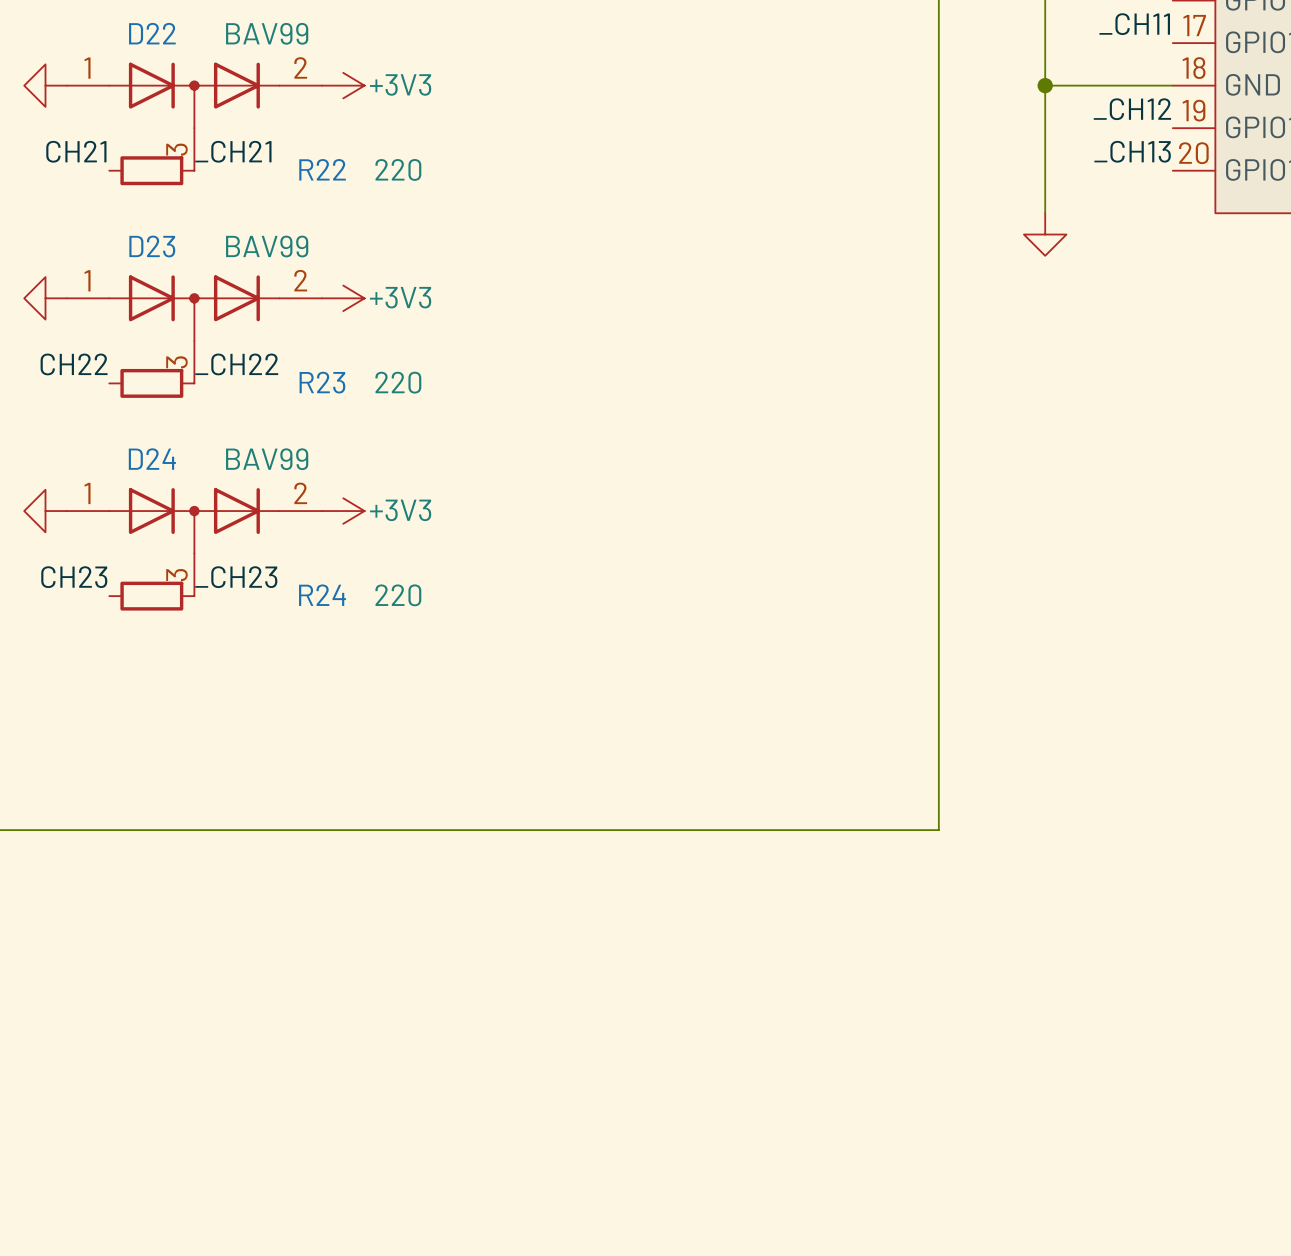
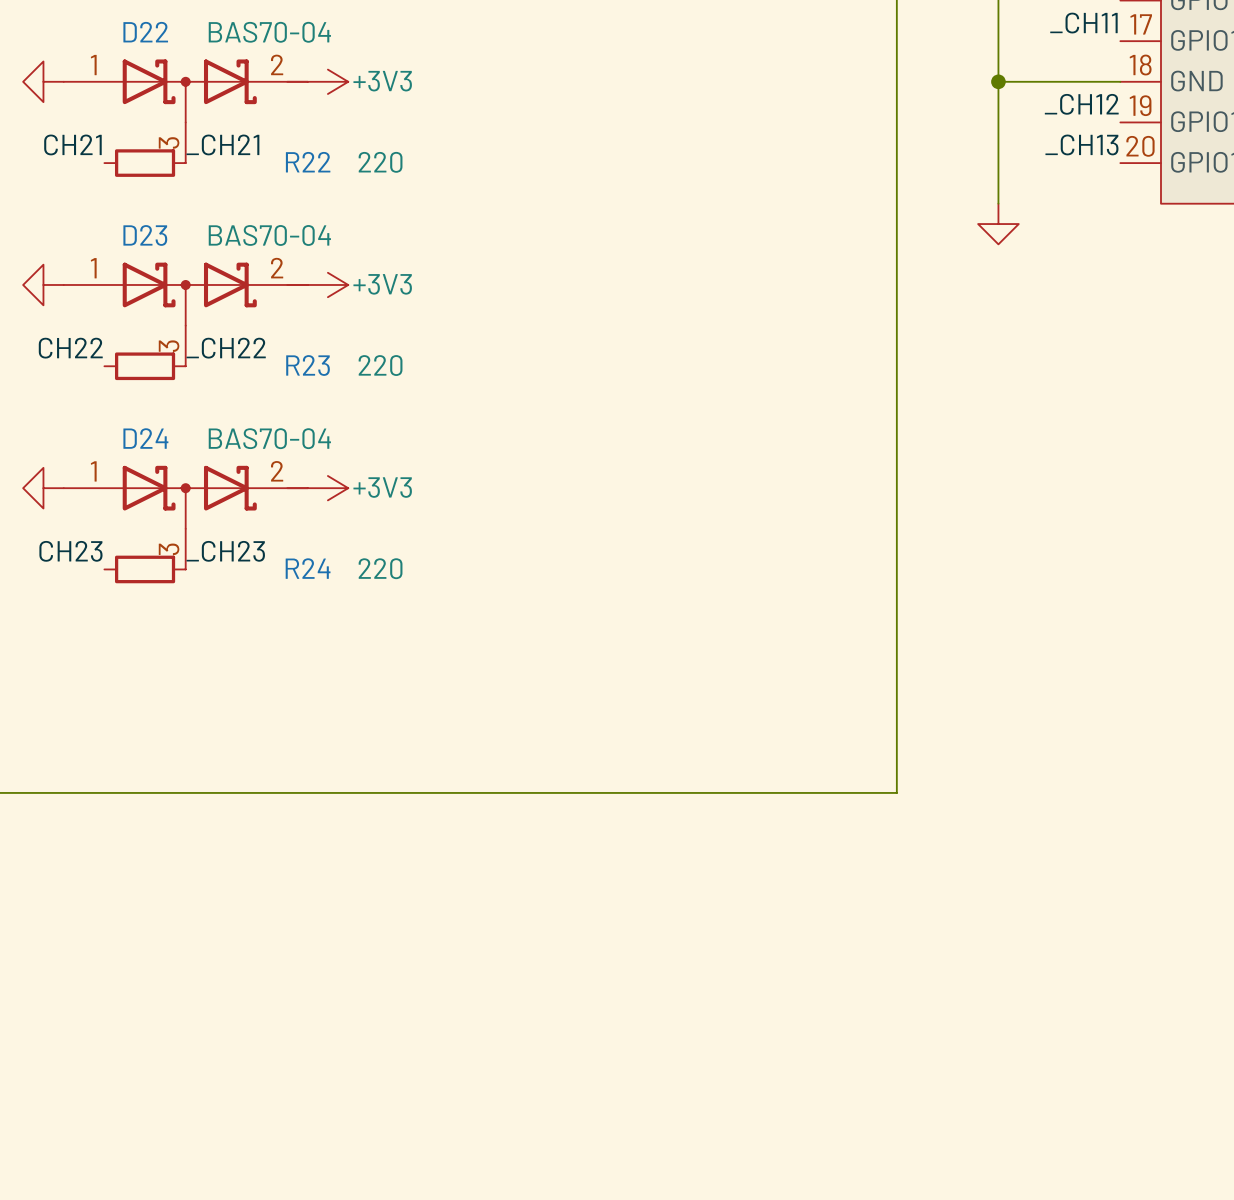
D22 value: BAV99 (267, 33) -> BAS70-04 (269, 32)
D22 symbol: [66, 62, 323, 171] -> [63, 59, 308, 164]
D23 value: BAV99 (267, 246) -> BAS70-04 (269, 235)
D23 symbol: [66, 275, 323, 384] -> [63, 262, 308, 367]
D24 value: BAV99 (267, 459) -> BAS70-04 (269, 438)
D24 symbol: [66, 488, 323, 597] -> [63, 465, 308, 570]

